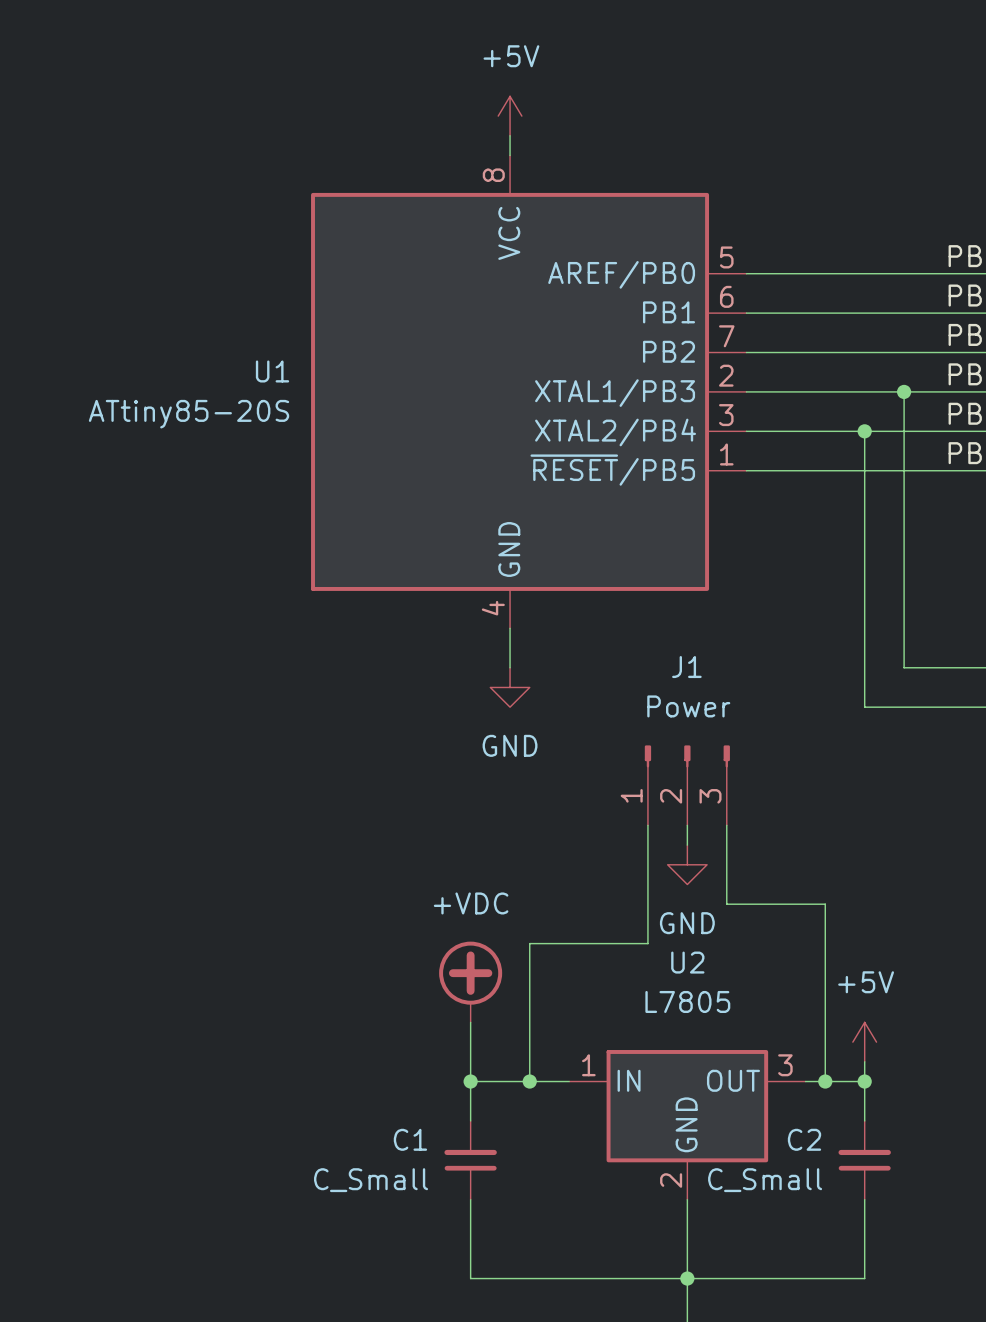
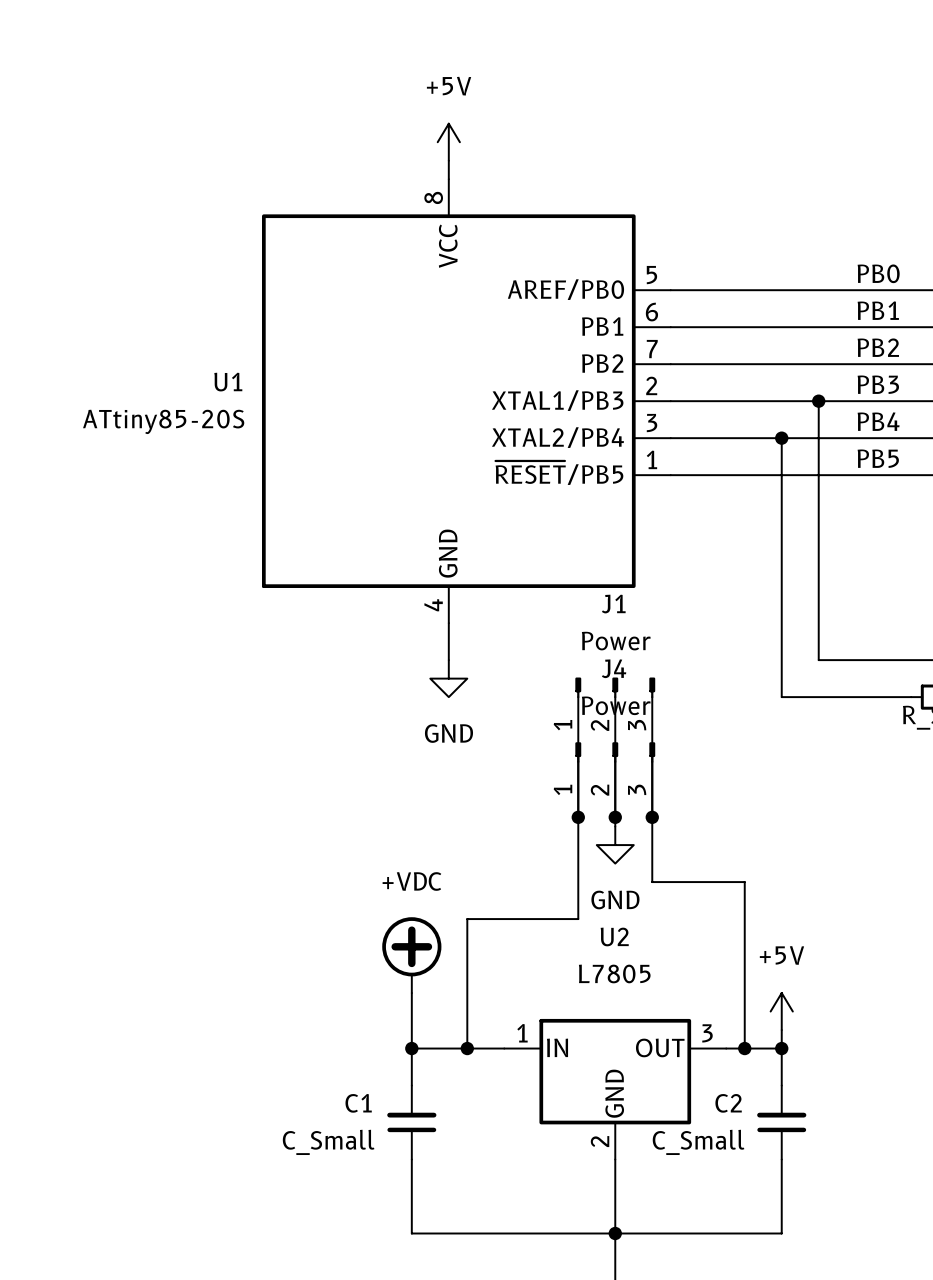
J1 position: (687, 785) -> (615, 715)
J4: none -> Power (615, 779)
junction: none -> (578, 817)
junction: none -> (615, 817)
junction: none -> (652, 817)

